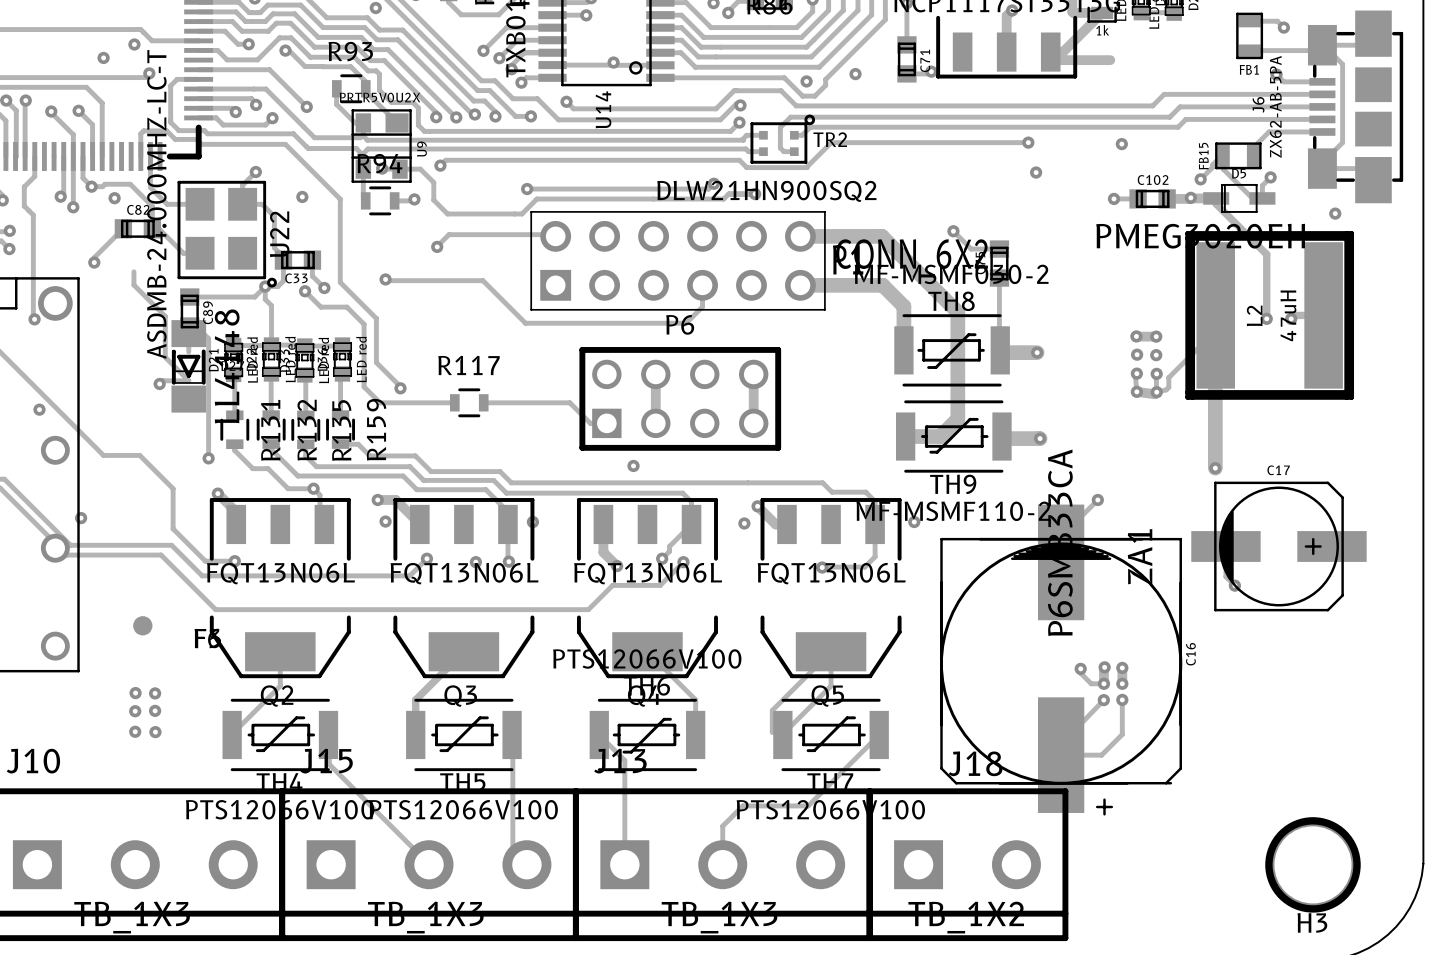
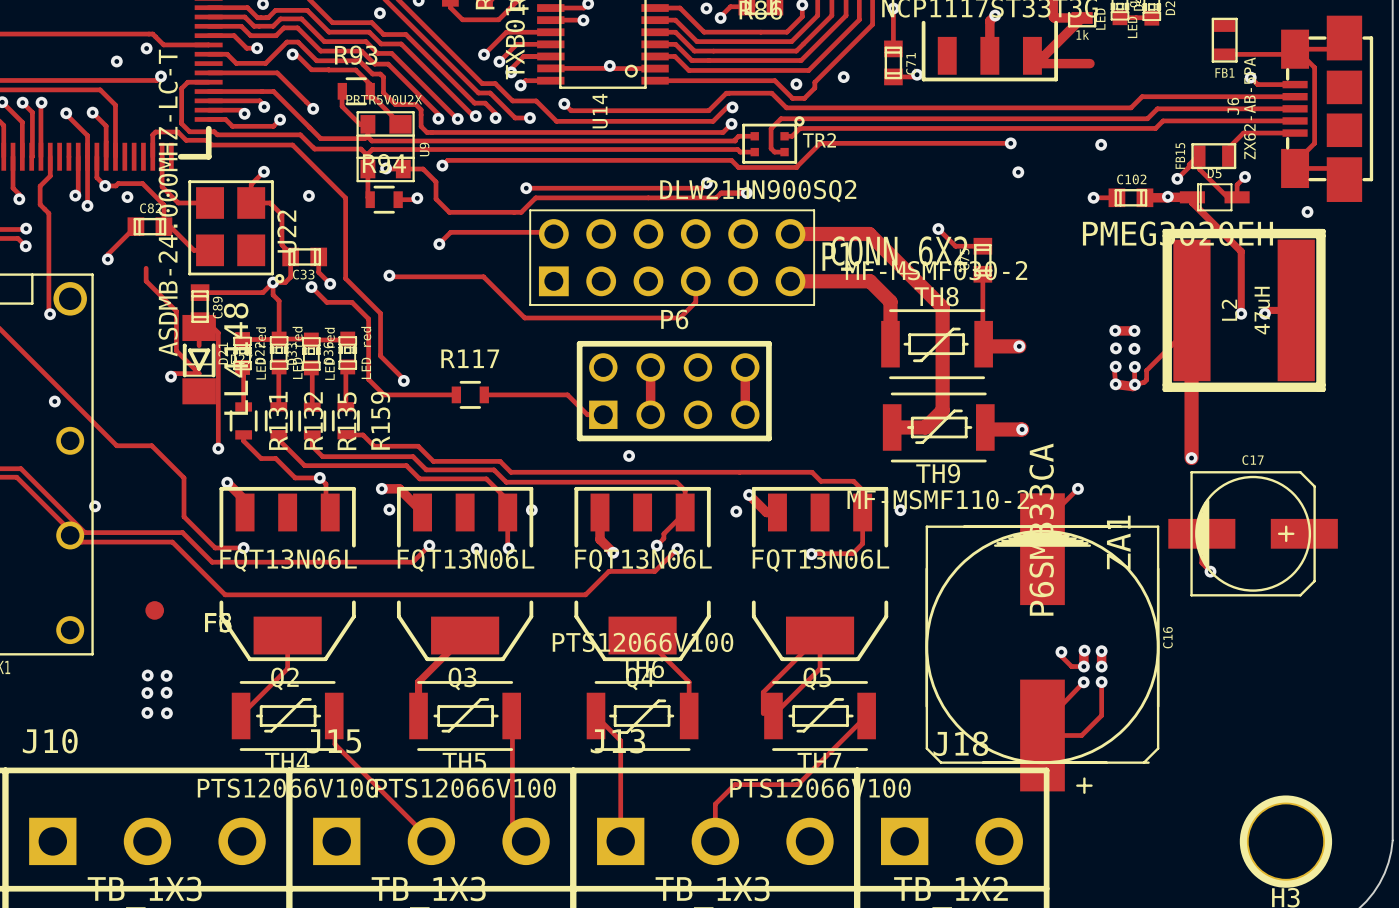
track: (1249, 21) (1277, 21) (1283, 27) -> none
via: (1283, 27) -> none

